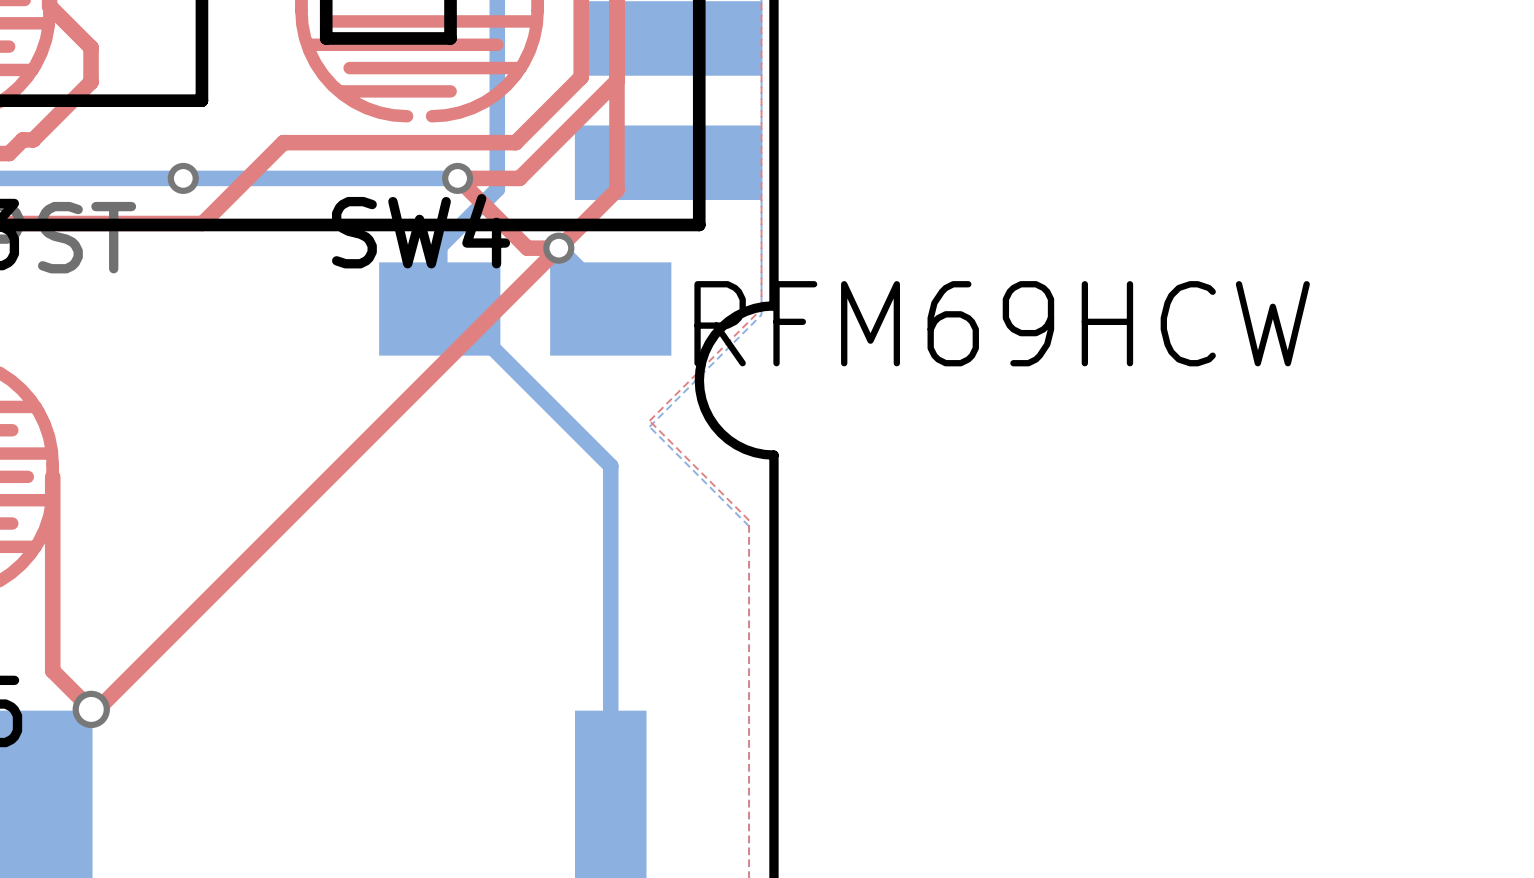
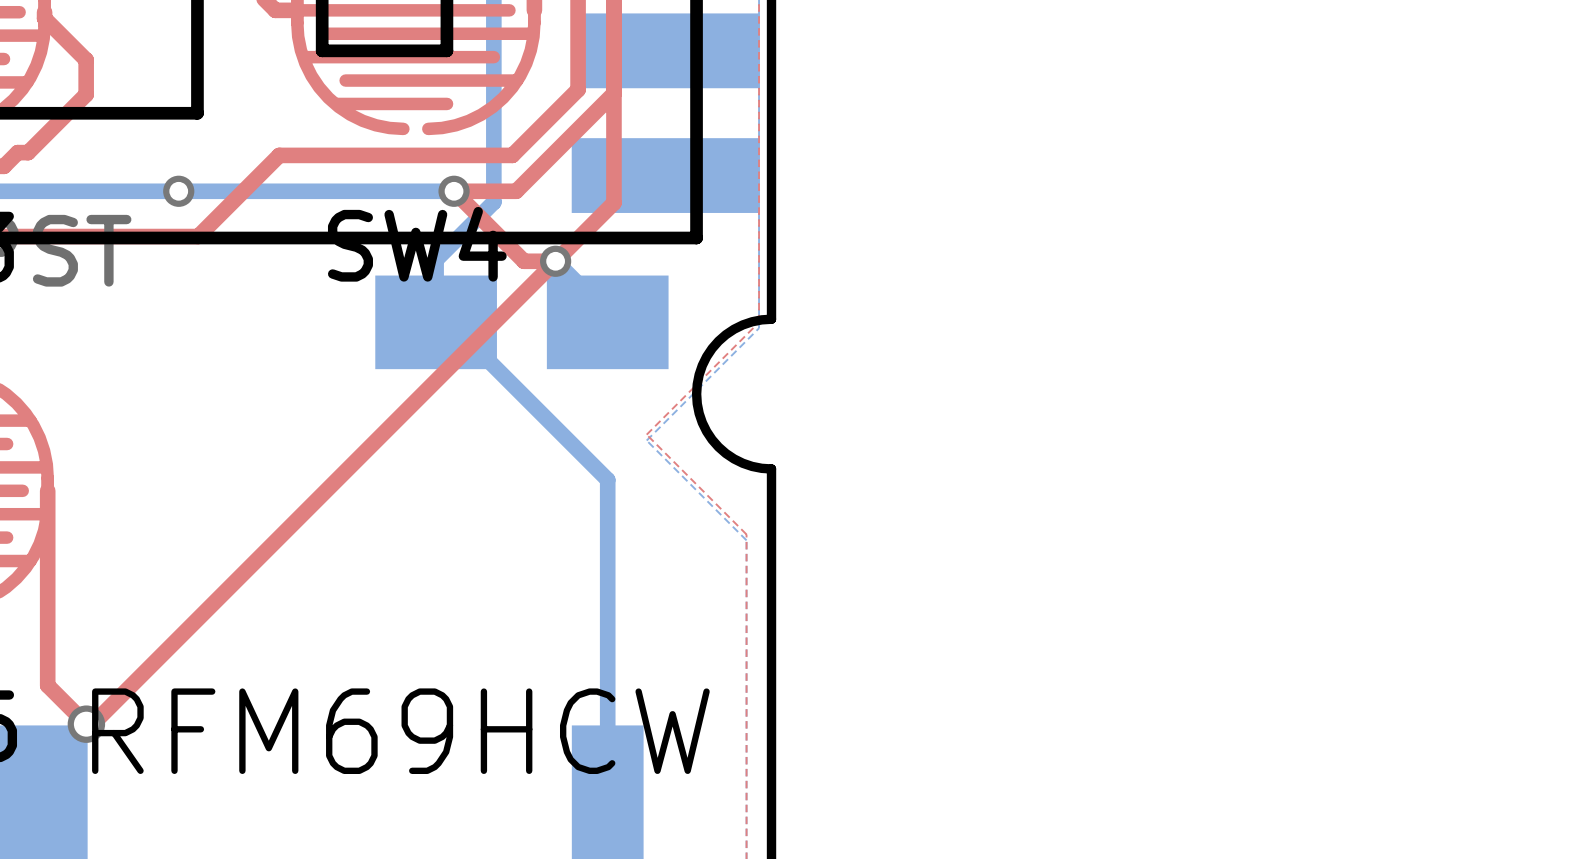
part value position: RFM69HCW (1002, 323) -> RFM69HCW (400, 731)

